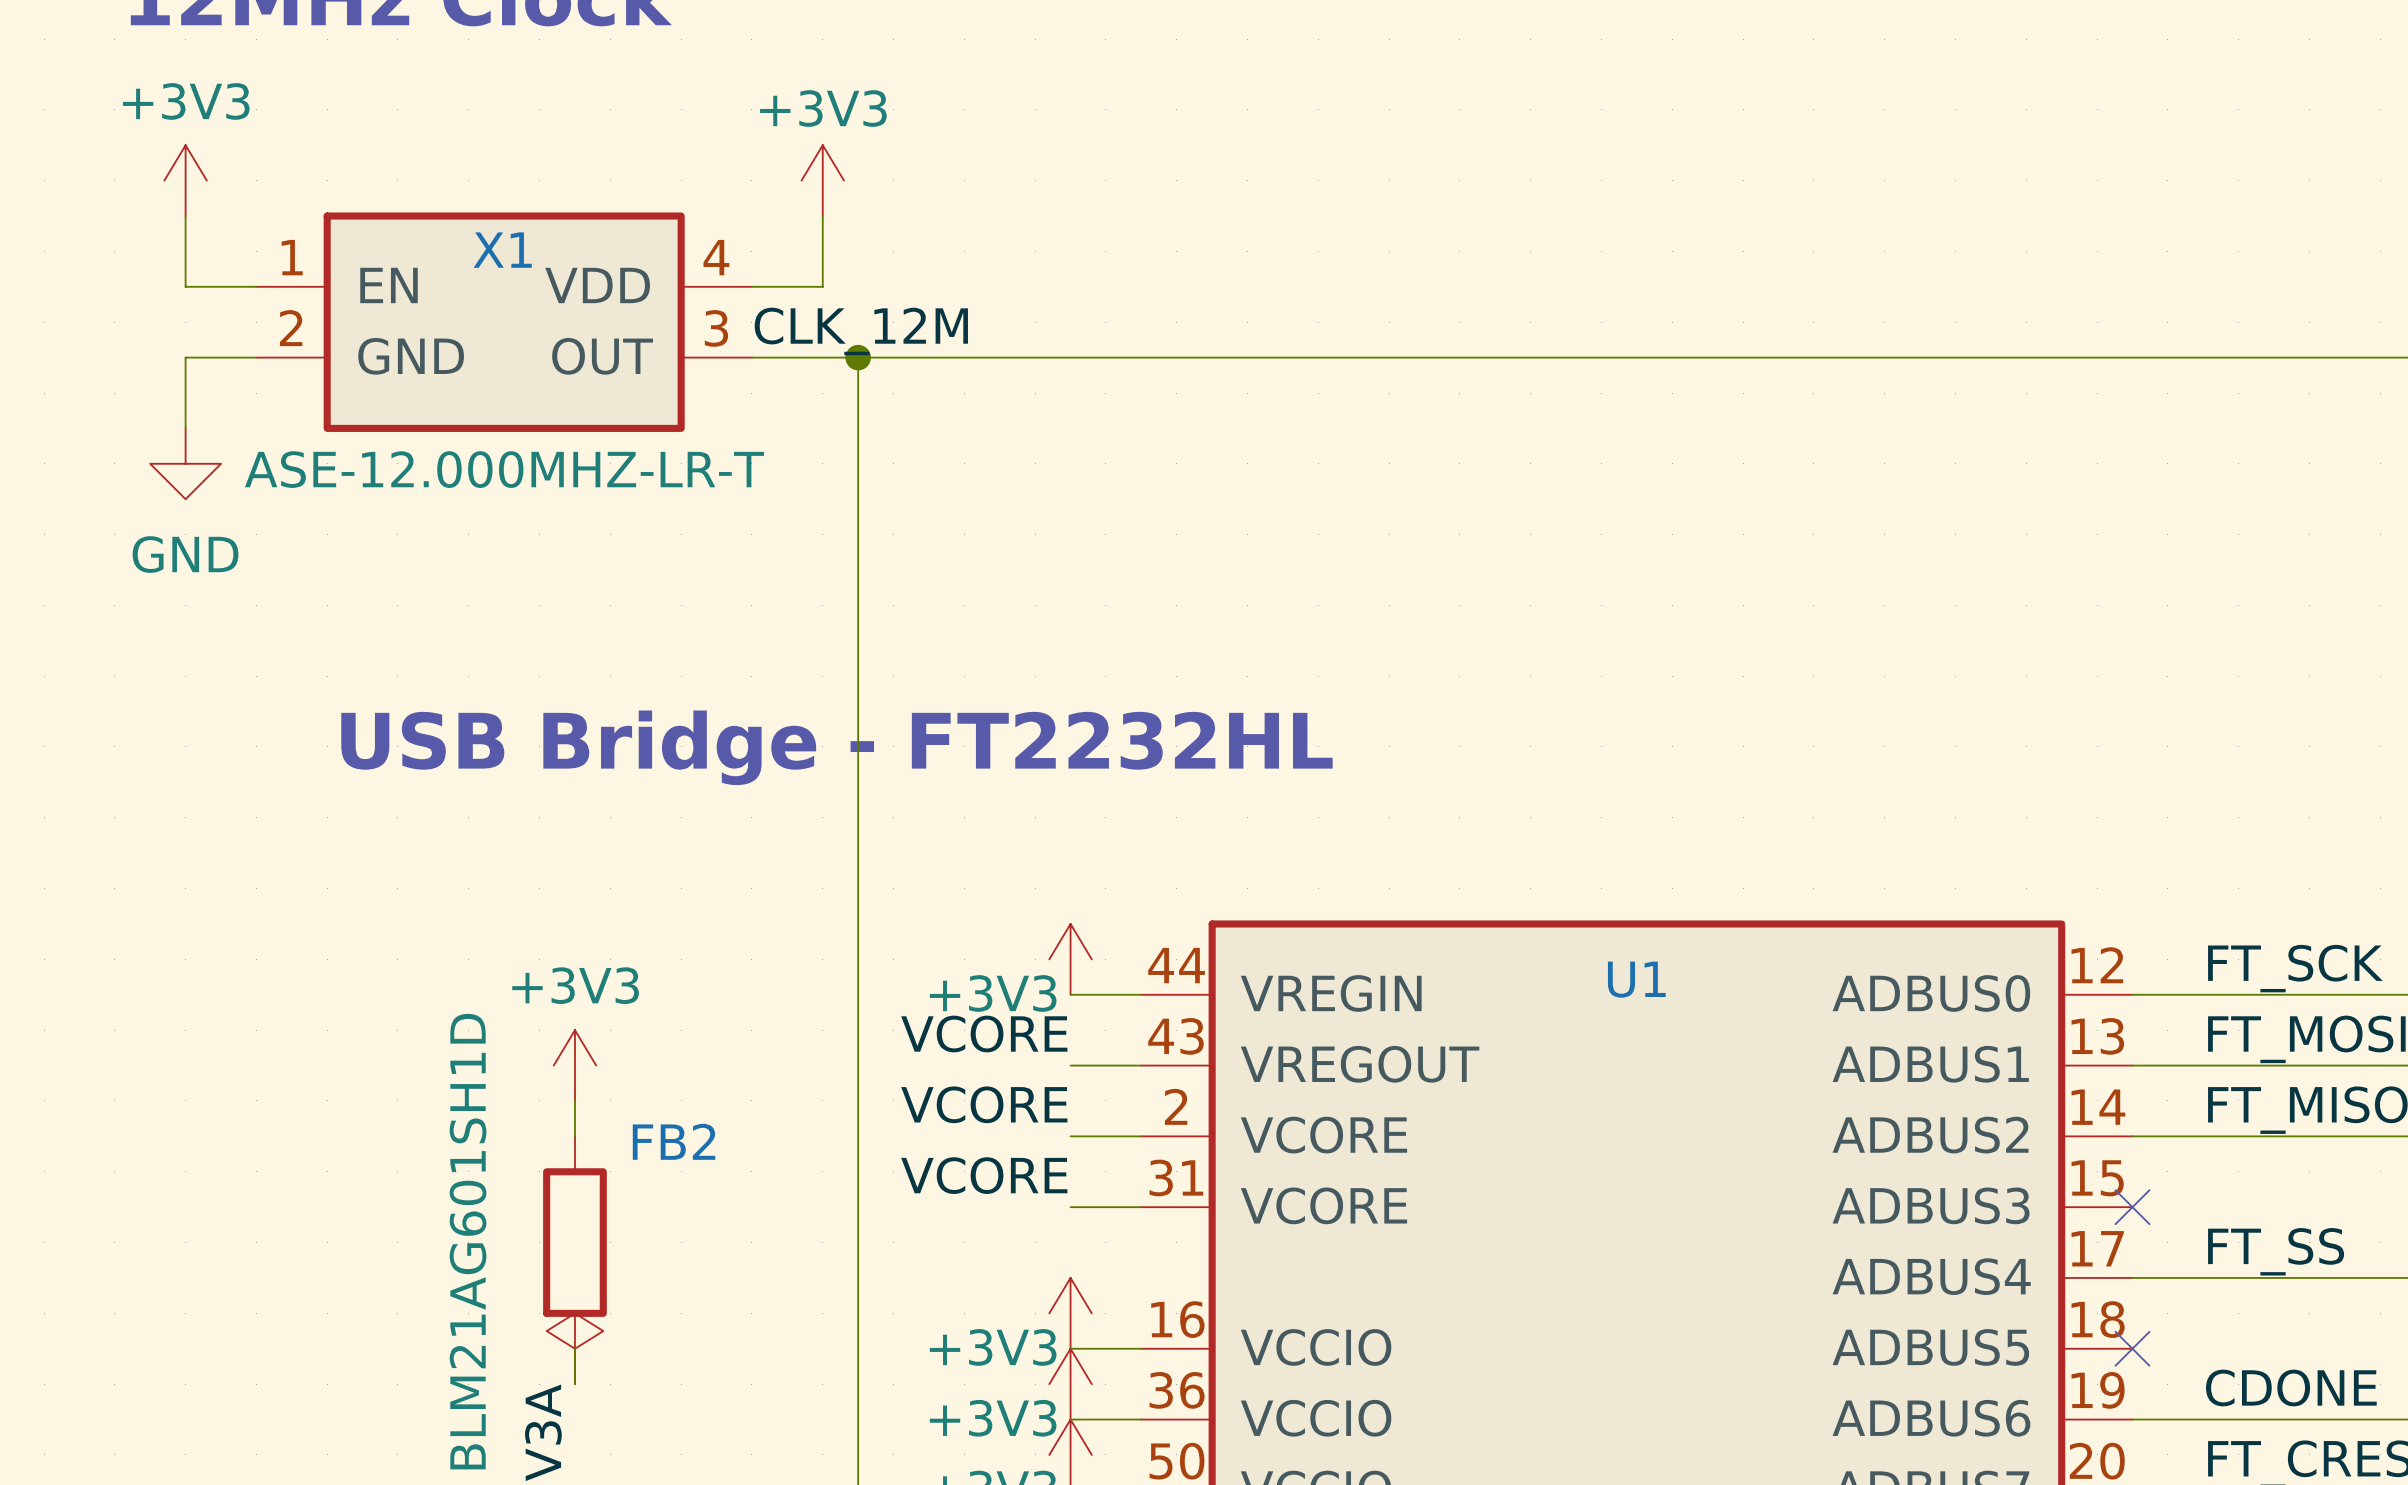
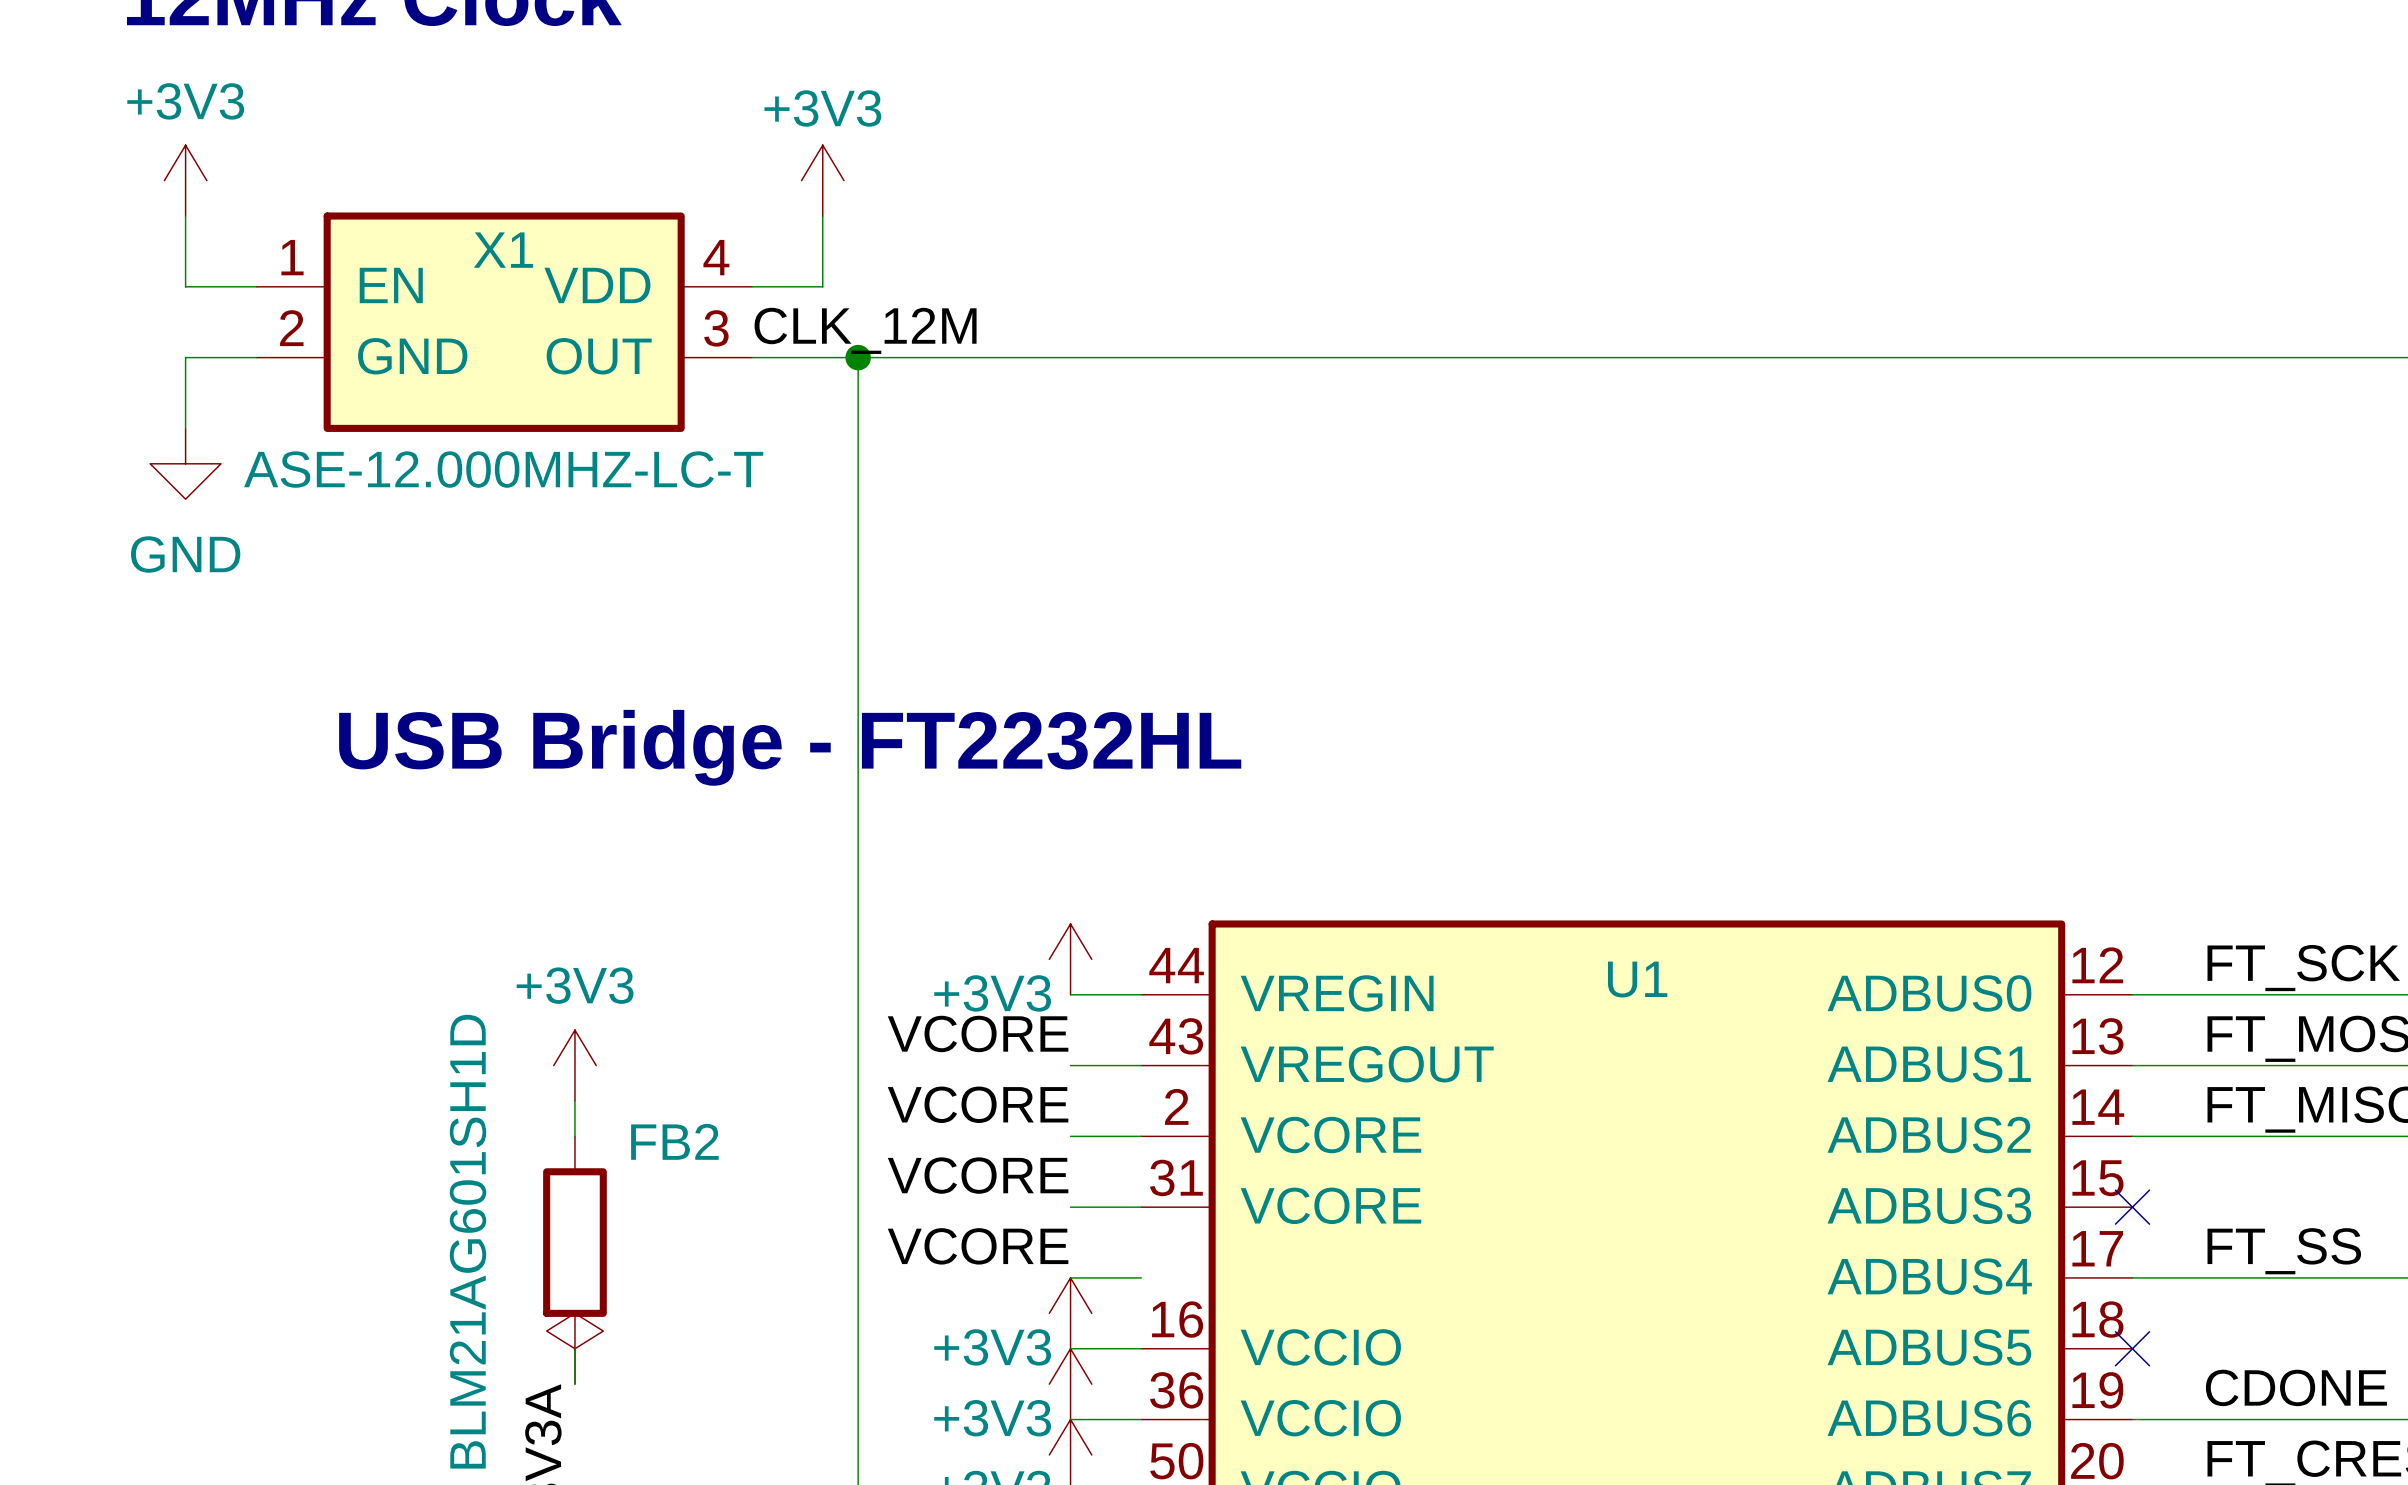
X1 value: ASE-12.000MHZ-LR-T (504, 469) -> ASE-12.000MHZ-LC-T (503, 469)
label: none -> VCORE (978, 1246)
wire: none -> (1070, 1277) (1141, 1277)

